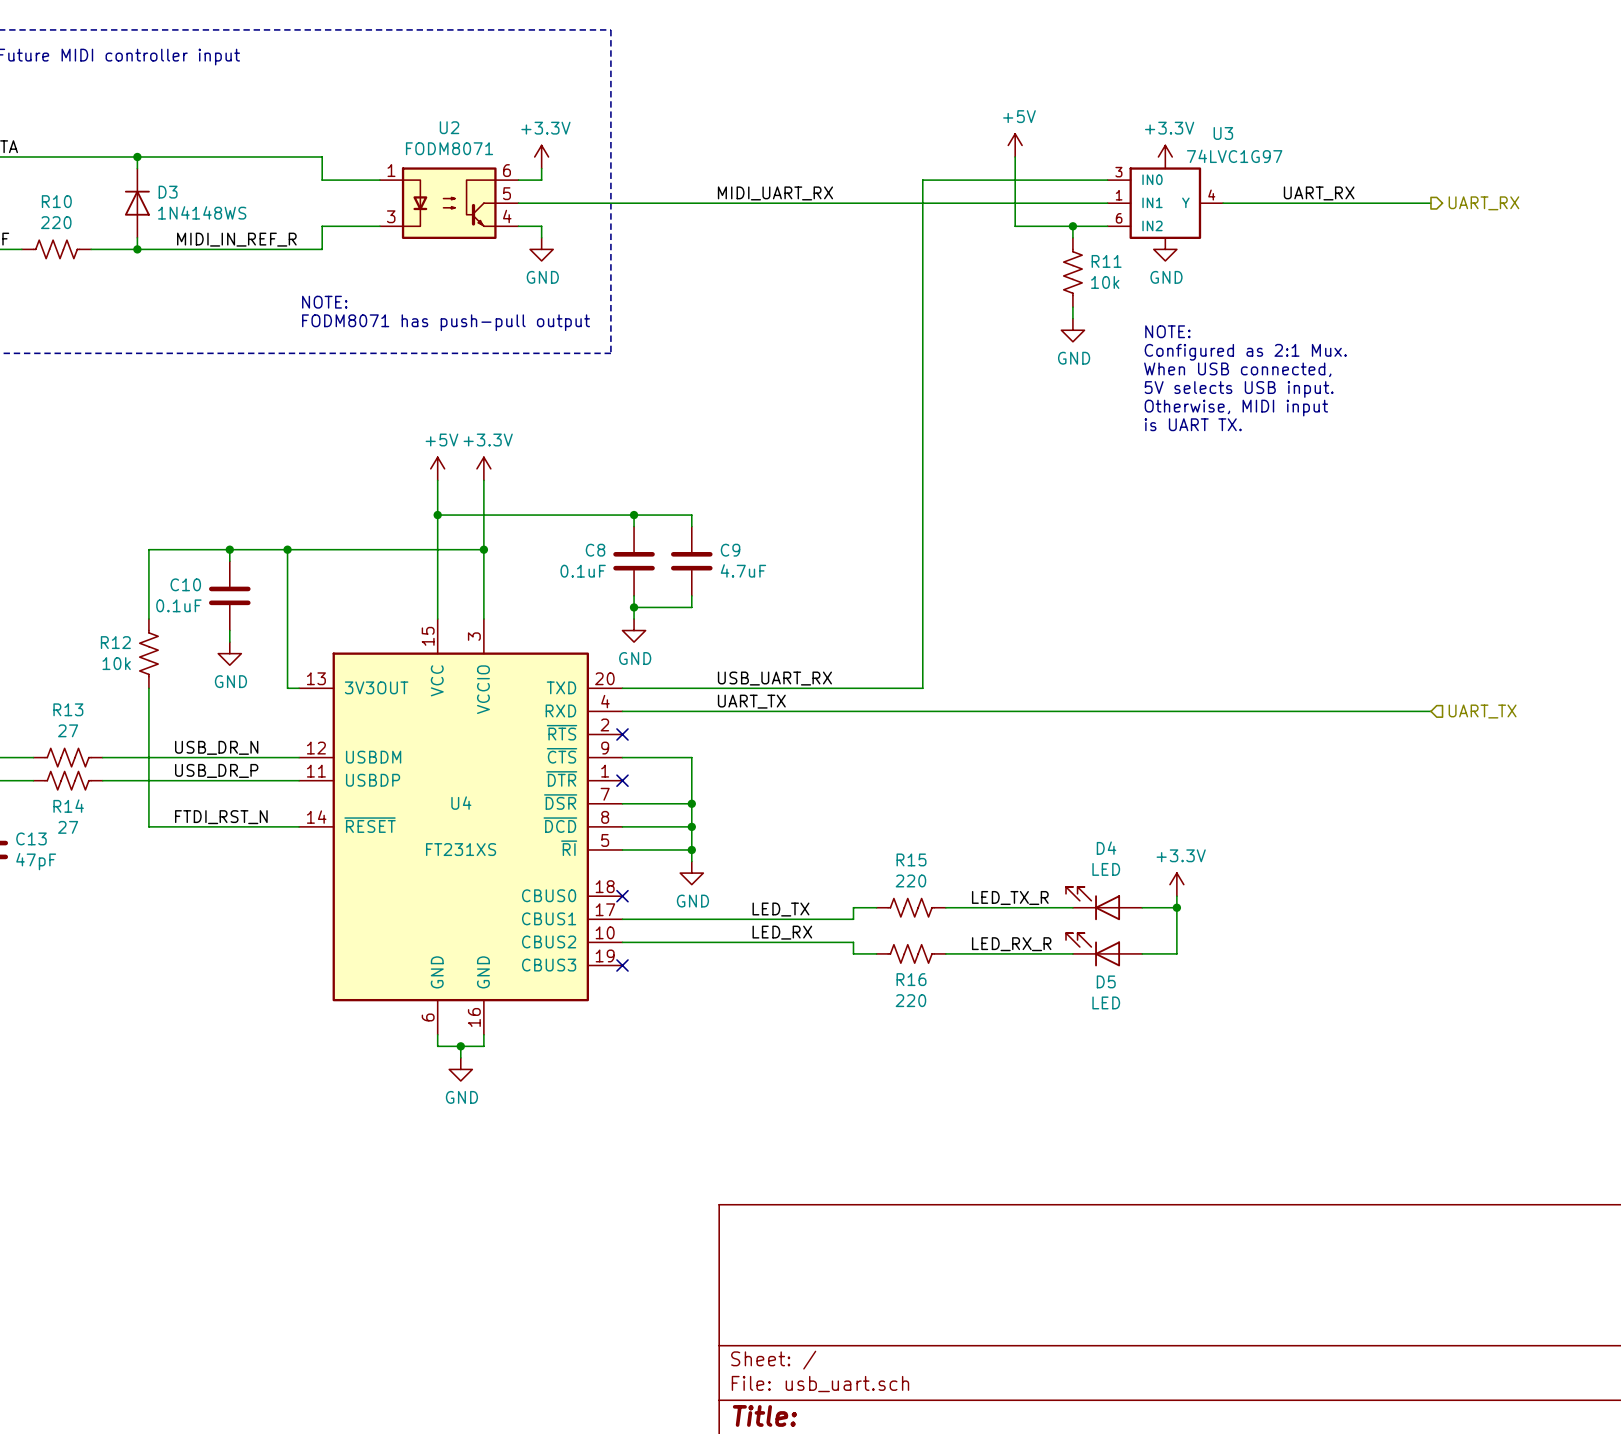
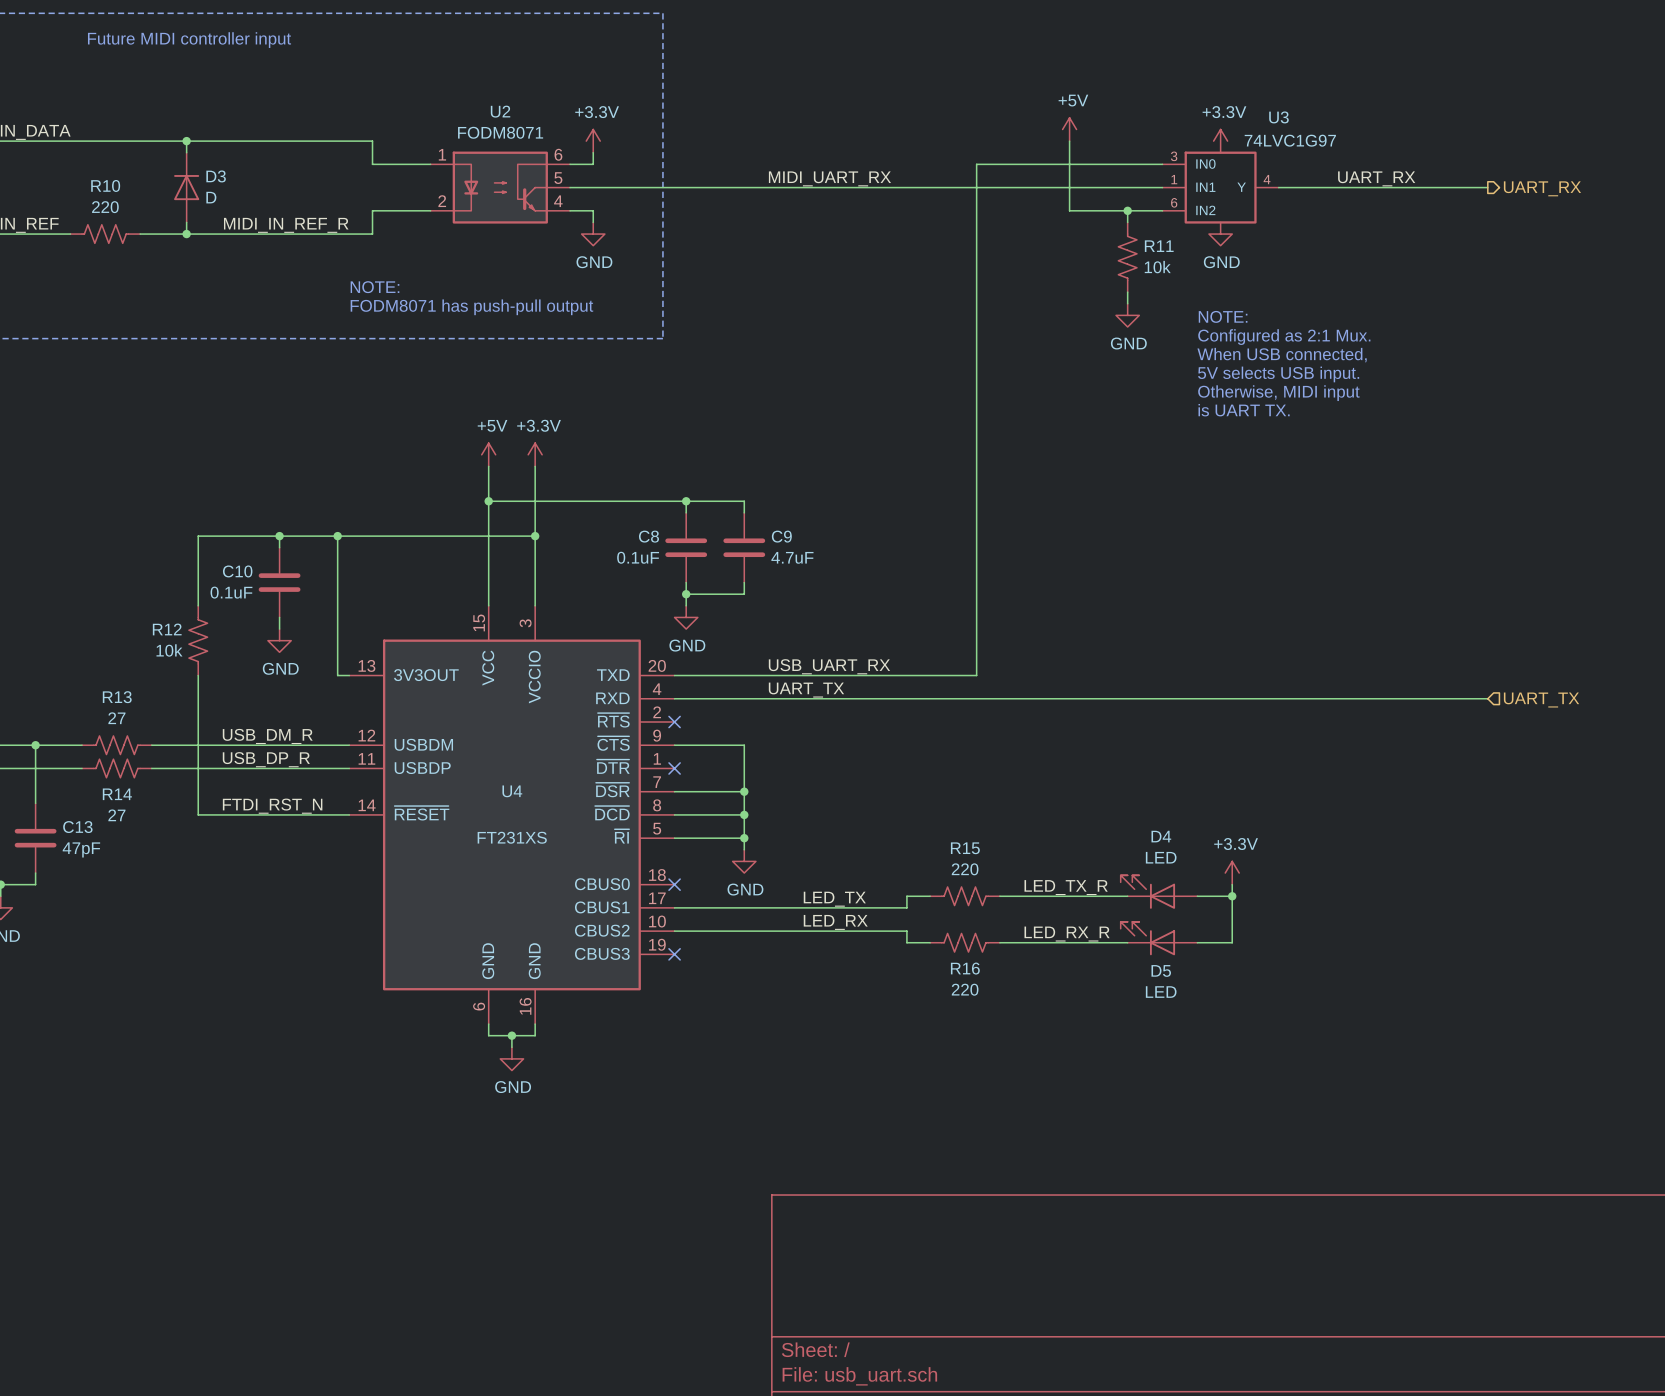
D3 value: 1N4148WS (202, 212) -> D (211, 197)
U2 pin number: 3 (391, 216) -> 2 (442, 201)
label: USB_DR_N (216, 747) -> USB_DM_R (267, 736)
label: USB_DR_P (216, 770) -> USB_DP_R (266, 759)

